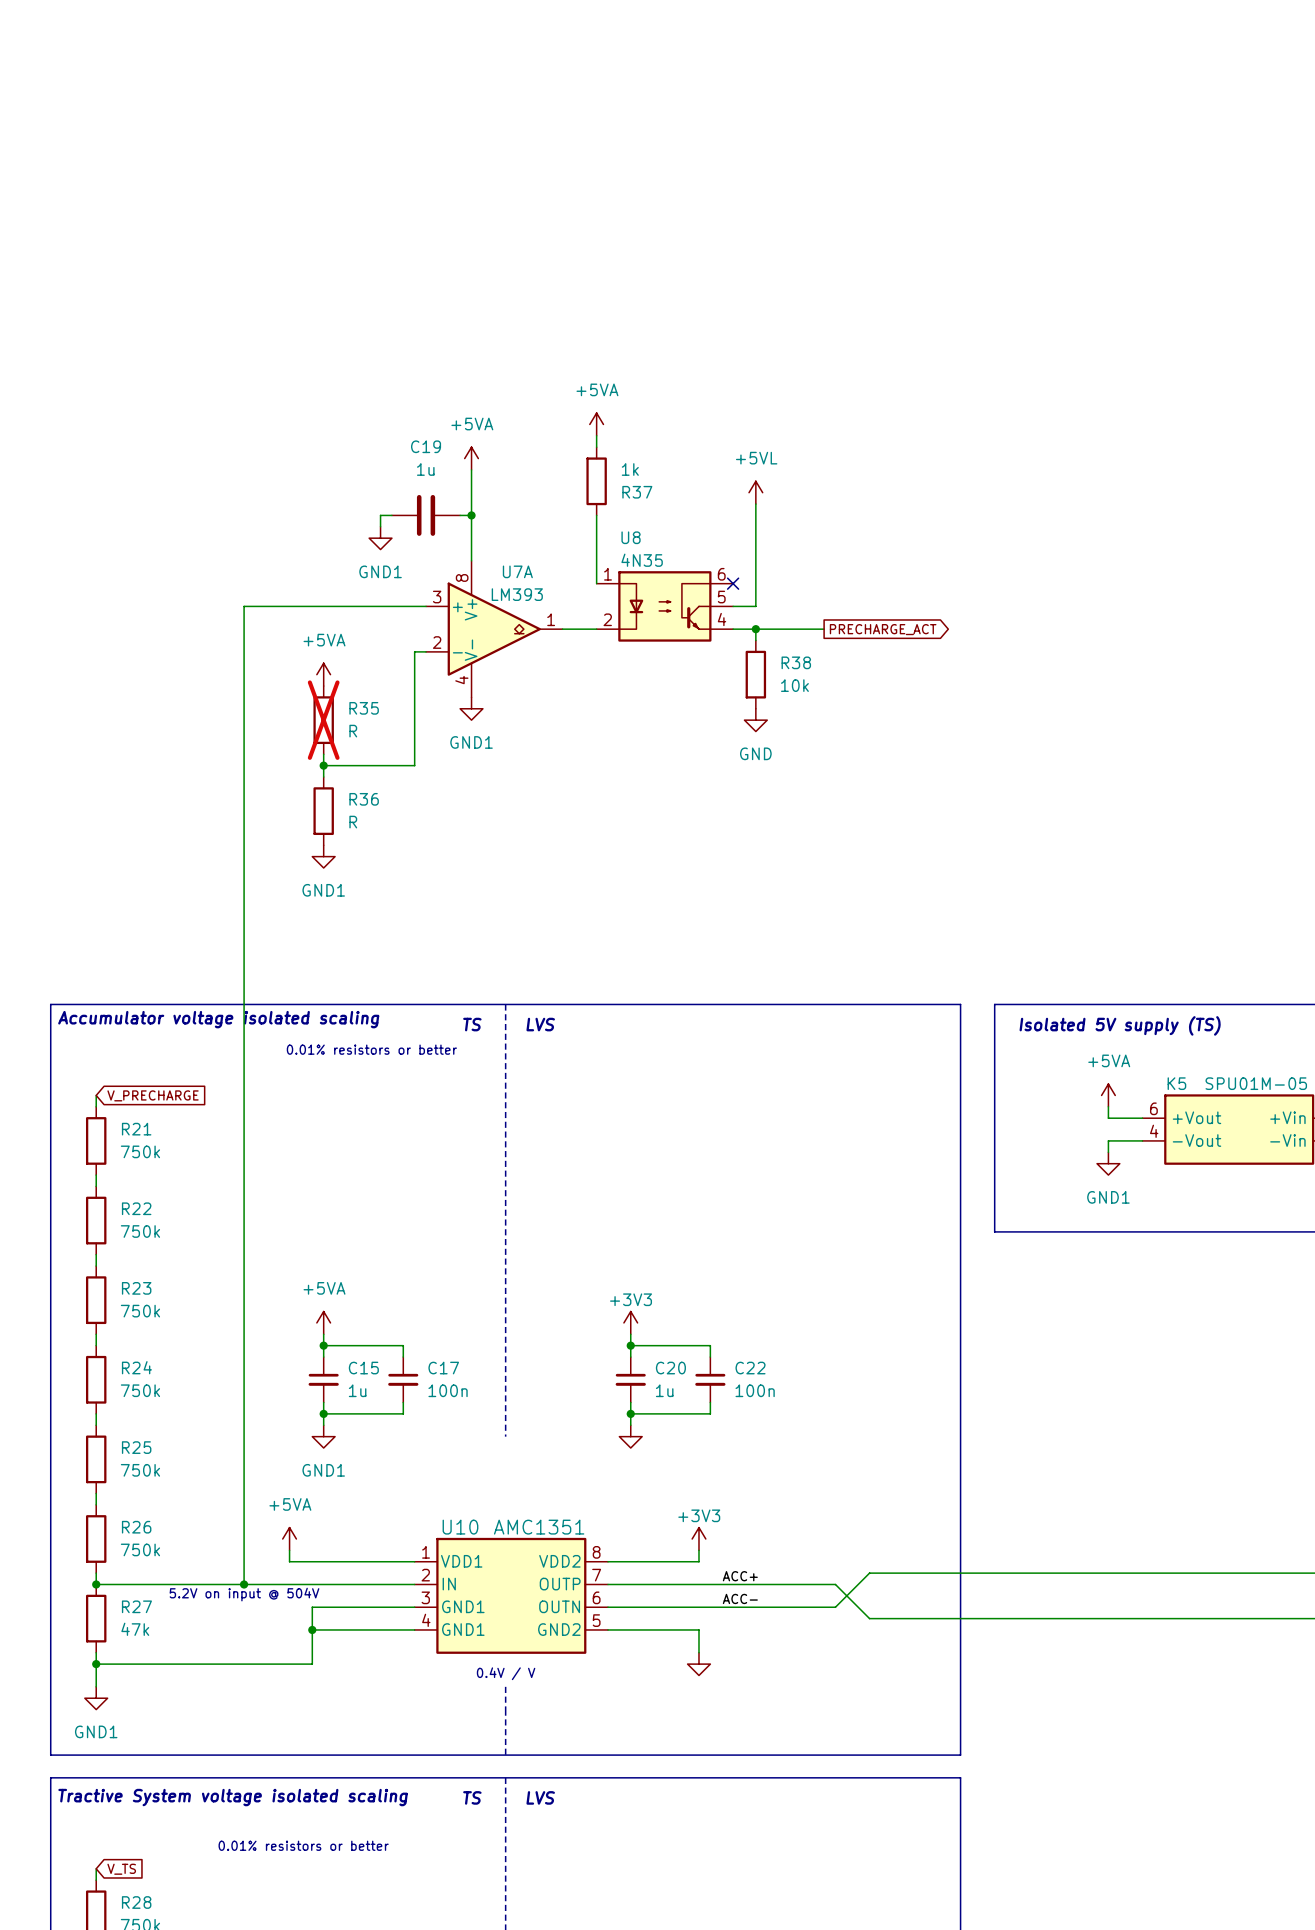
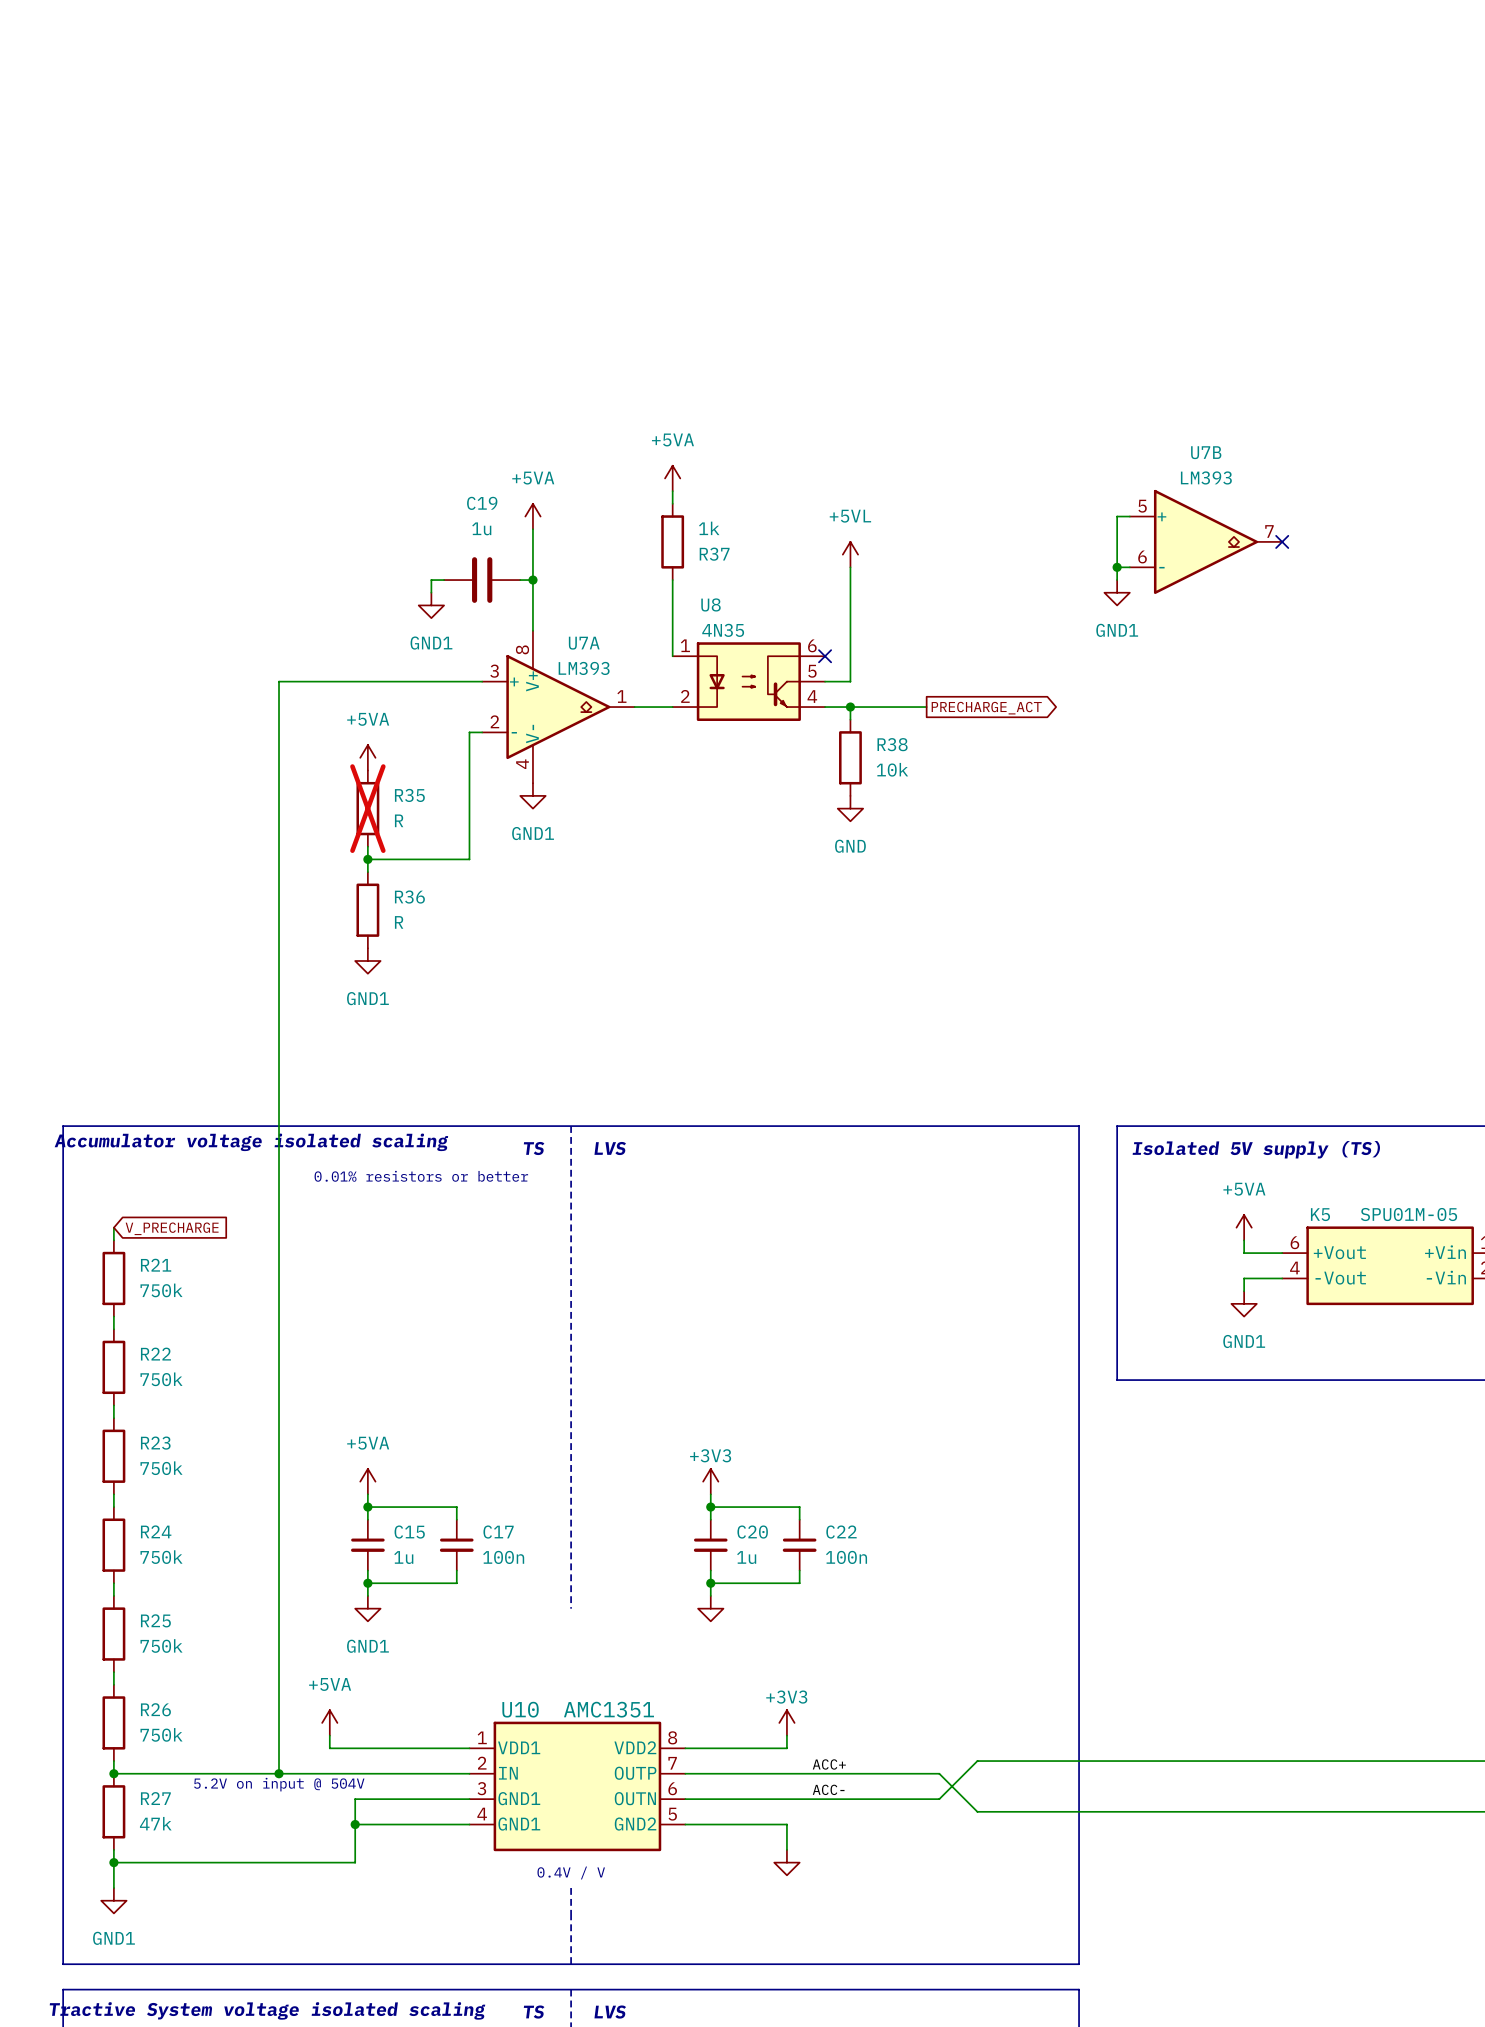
wire: none -> (1129, 516) (1117, 516) (1117, 580)
U7B: none -> LM393 (1206, 541)
no-connect mark: none -> (1282, 541)
wire: none -> (1117, 567) (1129, 567)
junction: none -> (1117, 567)
power symbol: none -> GND1 (1117, 592)

